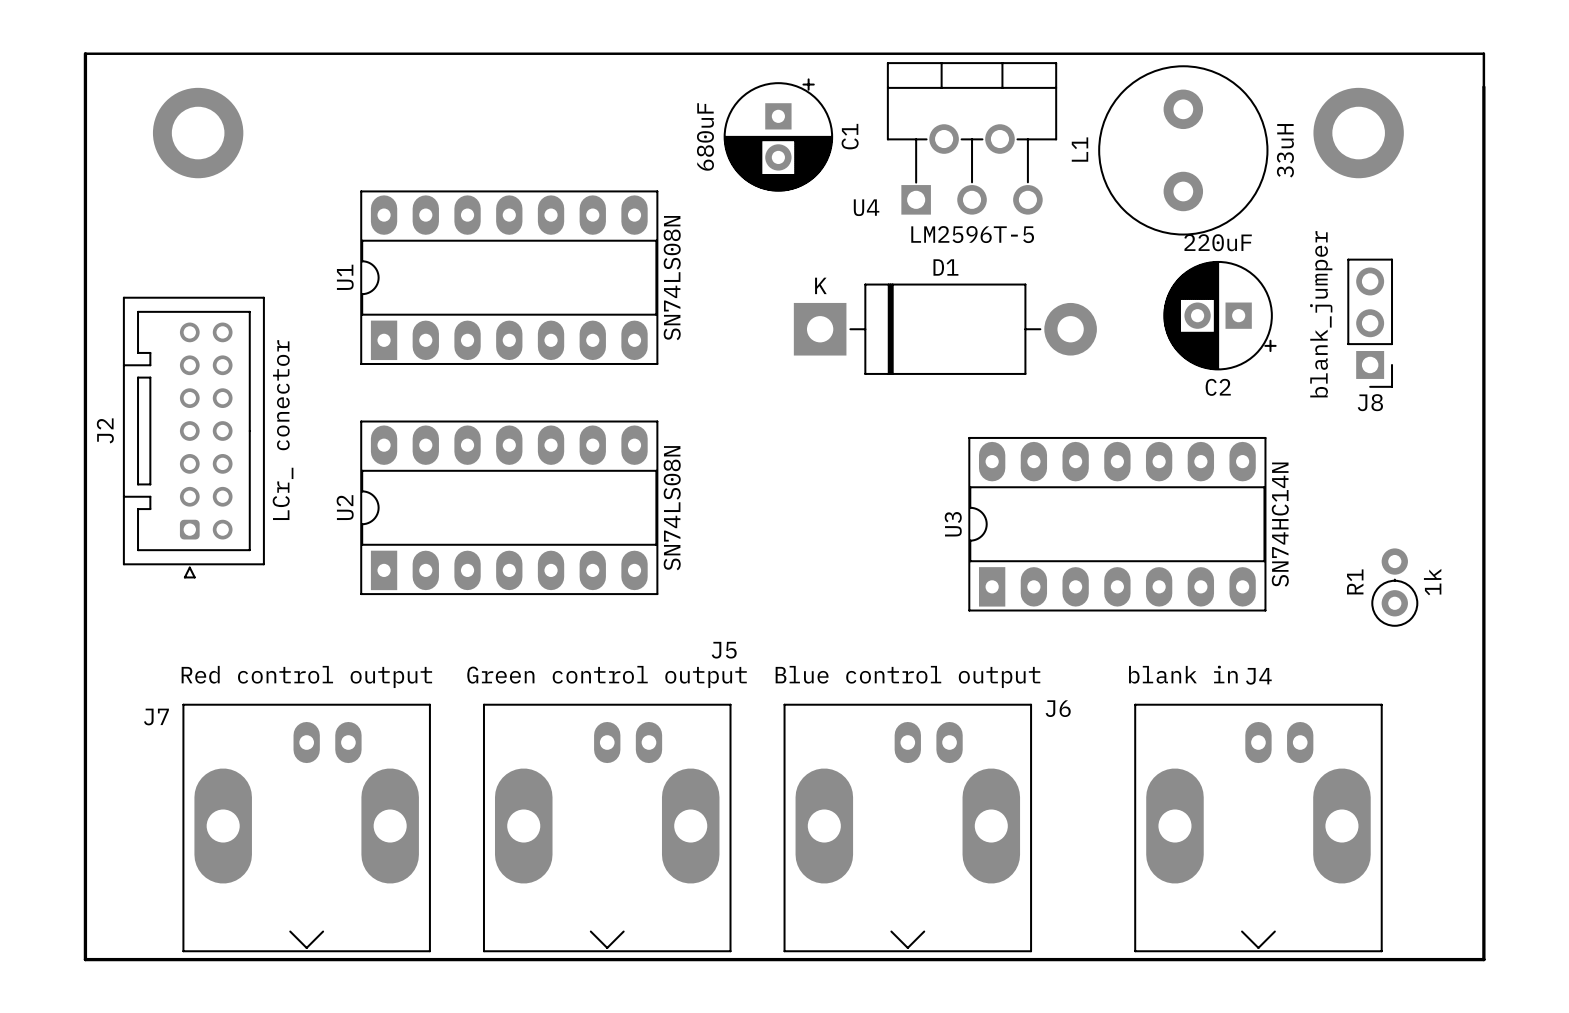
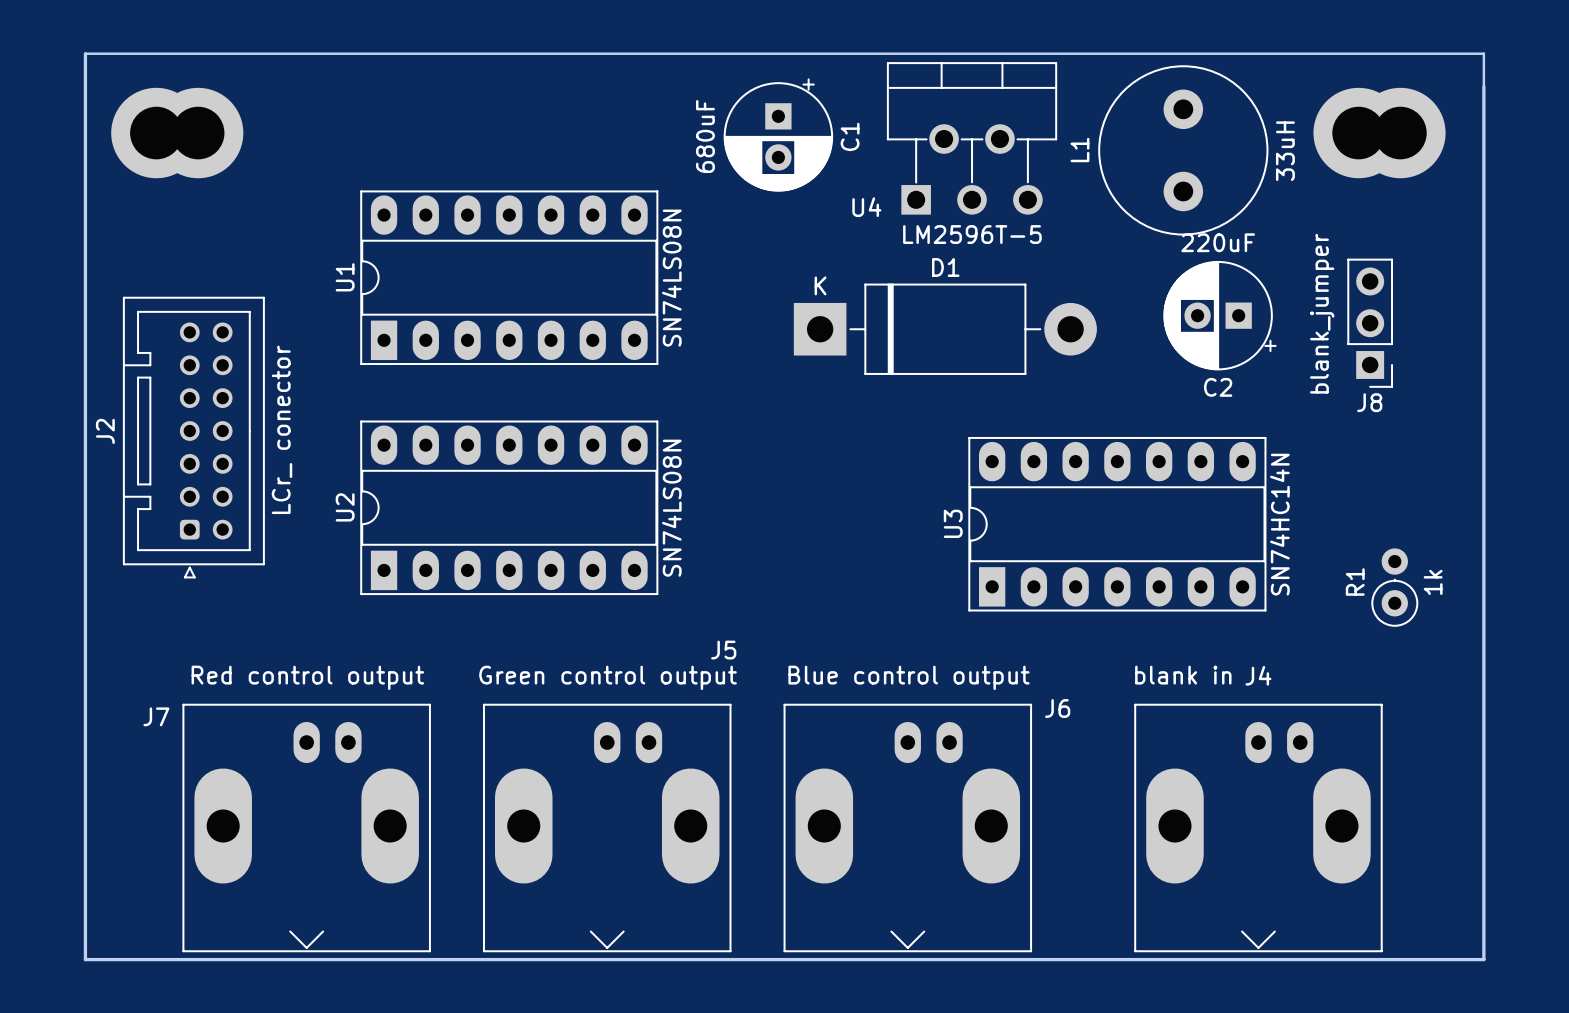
part: none -> (156, 133)
part: none -> (1400, 133)

